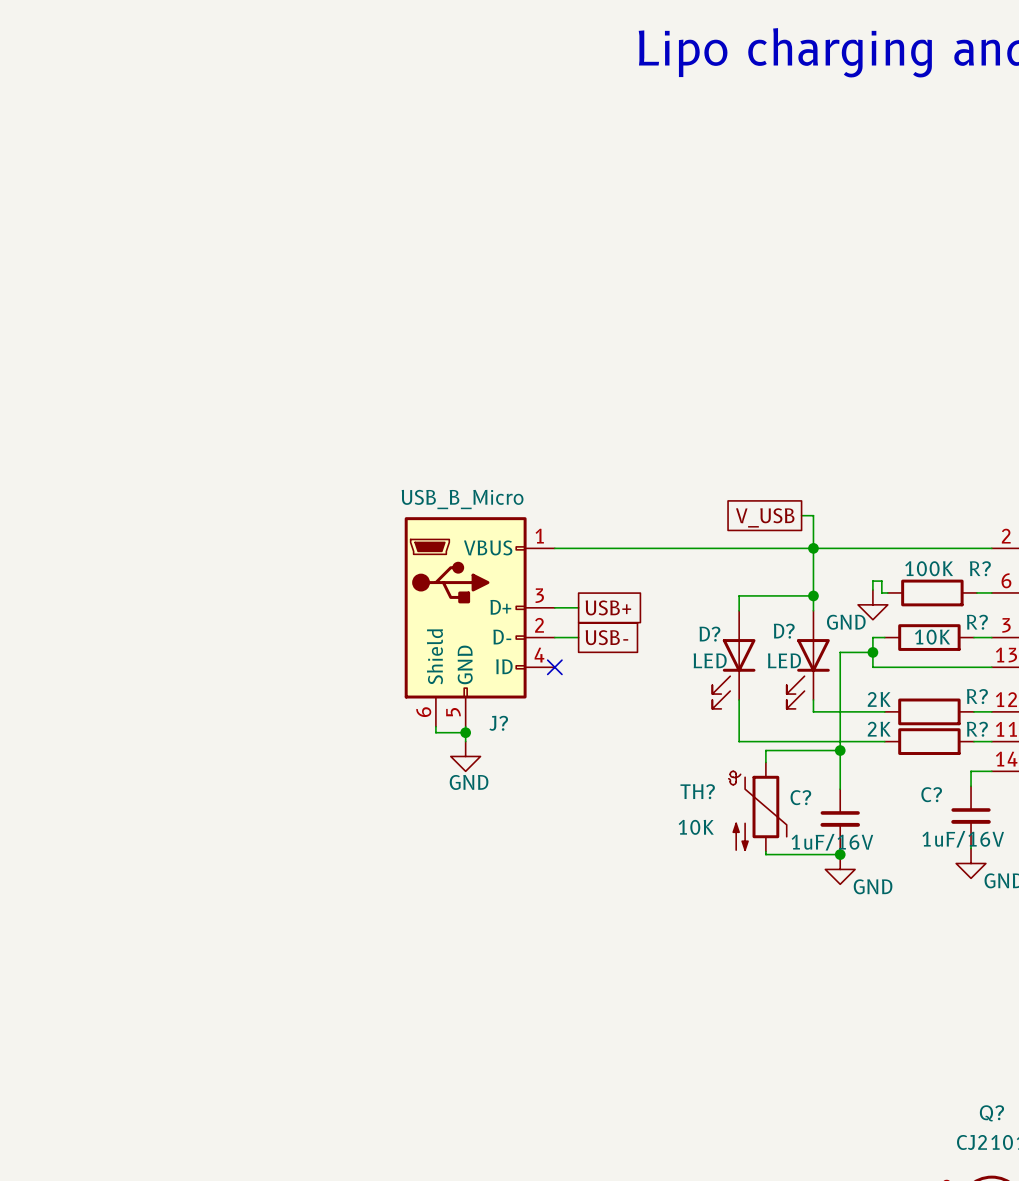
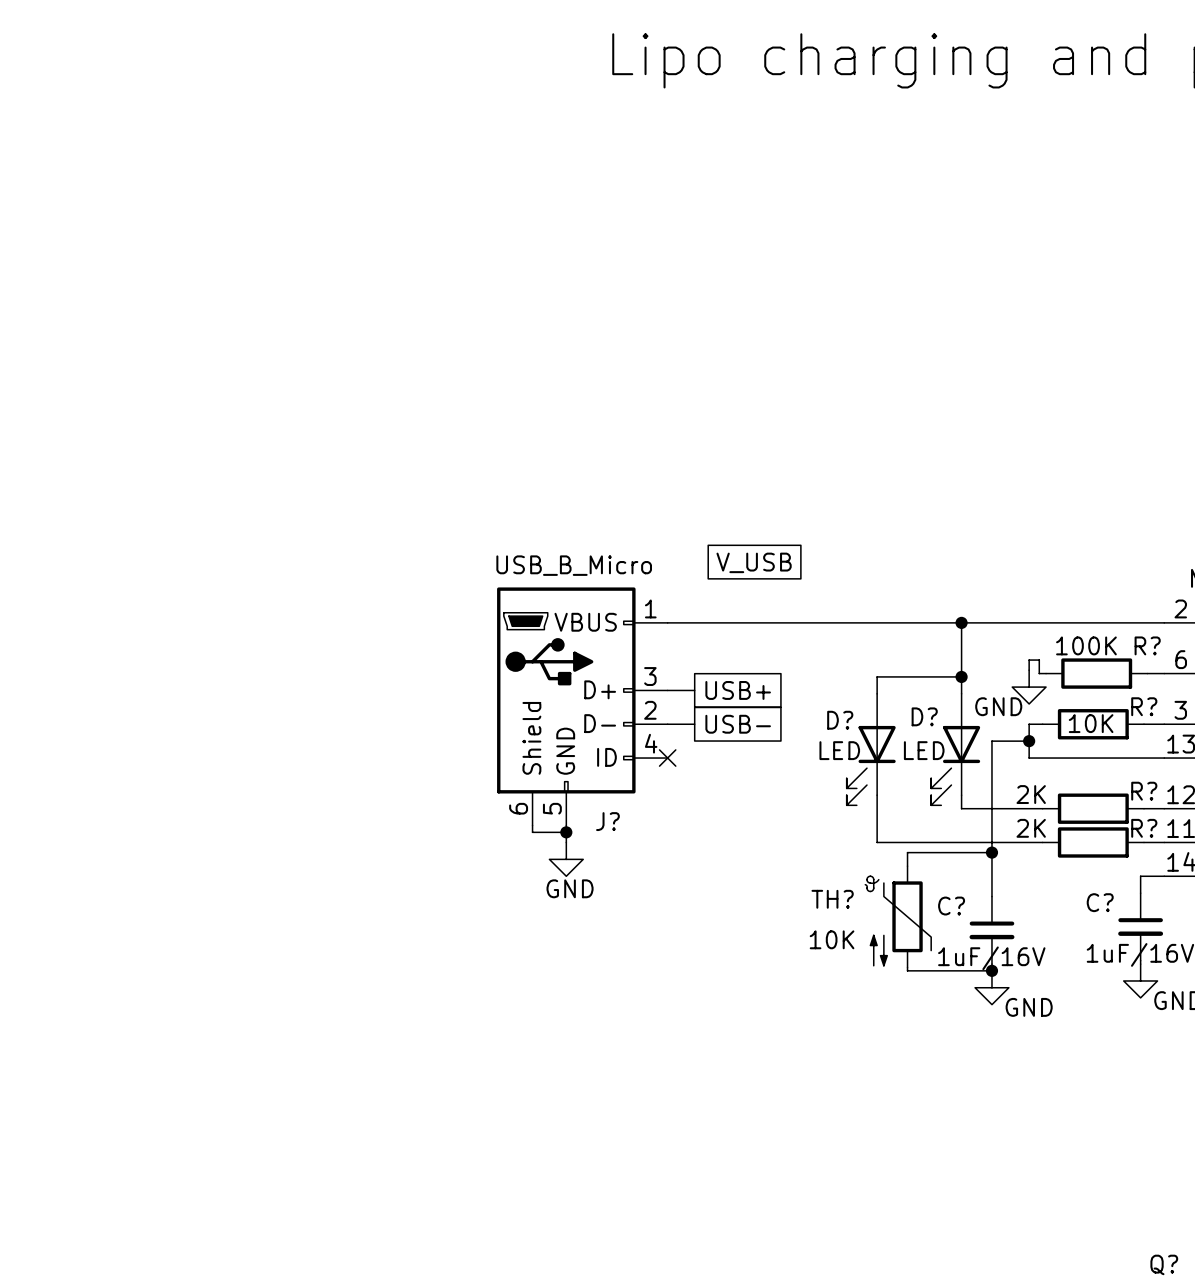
wire: (801, 515) (813, 515) (813, 548) -> none
global label rotation: 0° (765, 517) -> 180° (754, 562)

